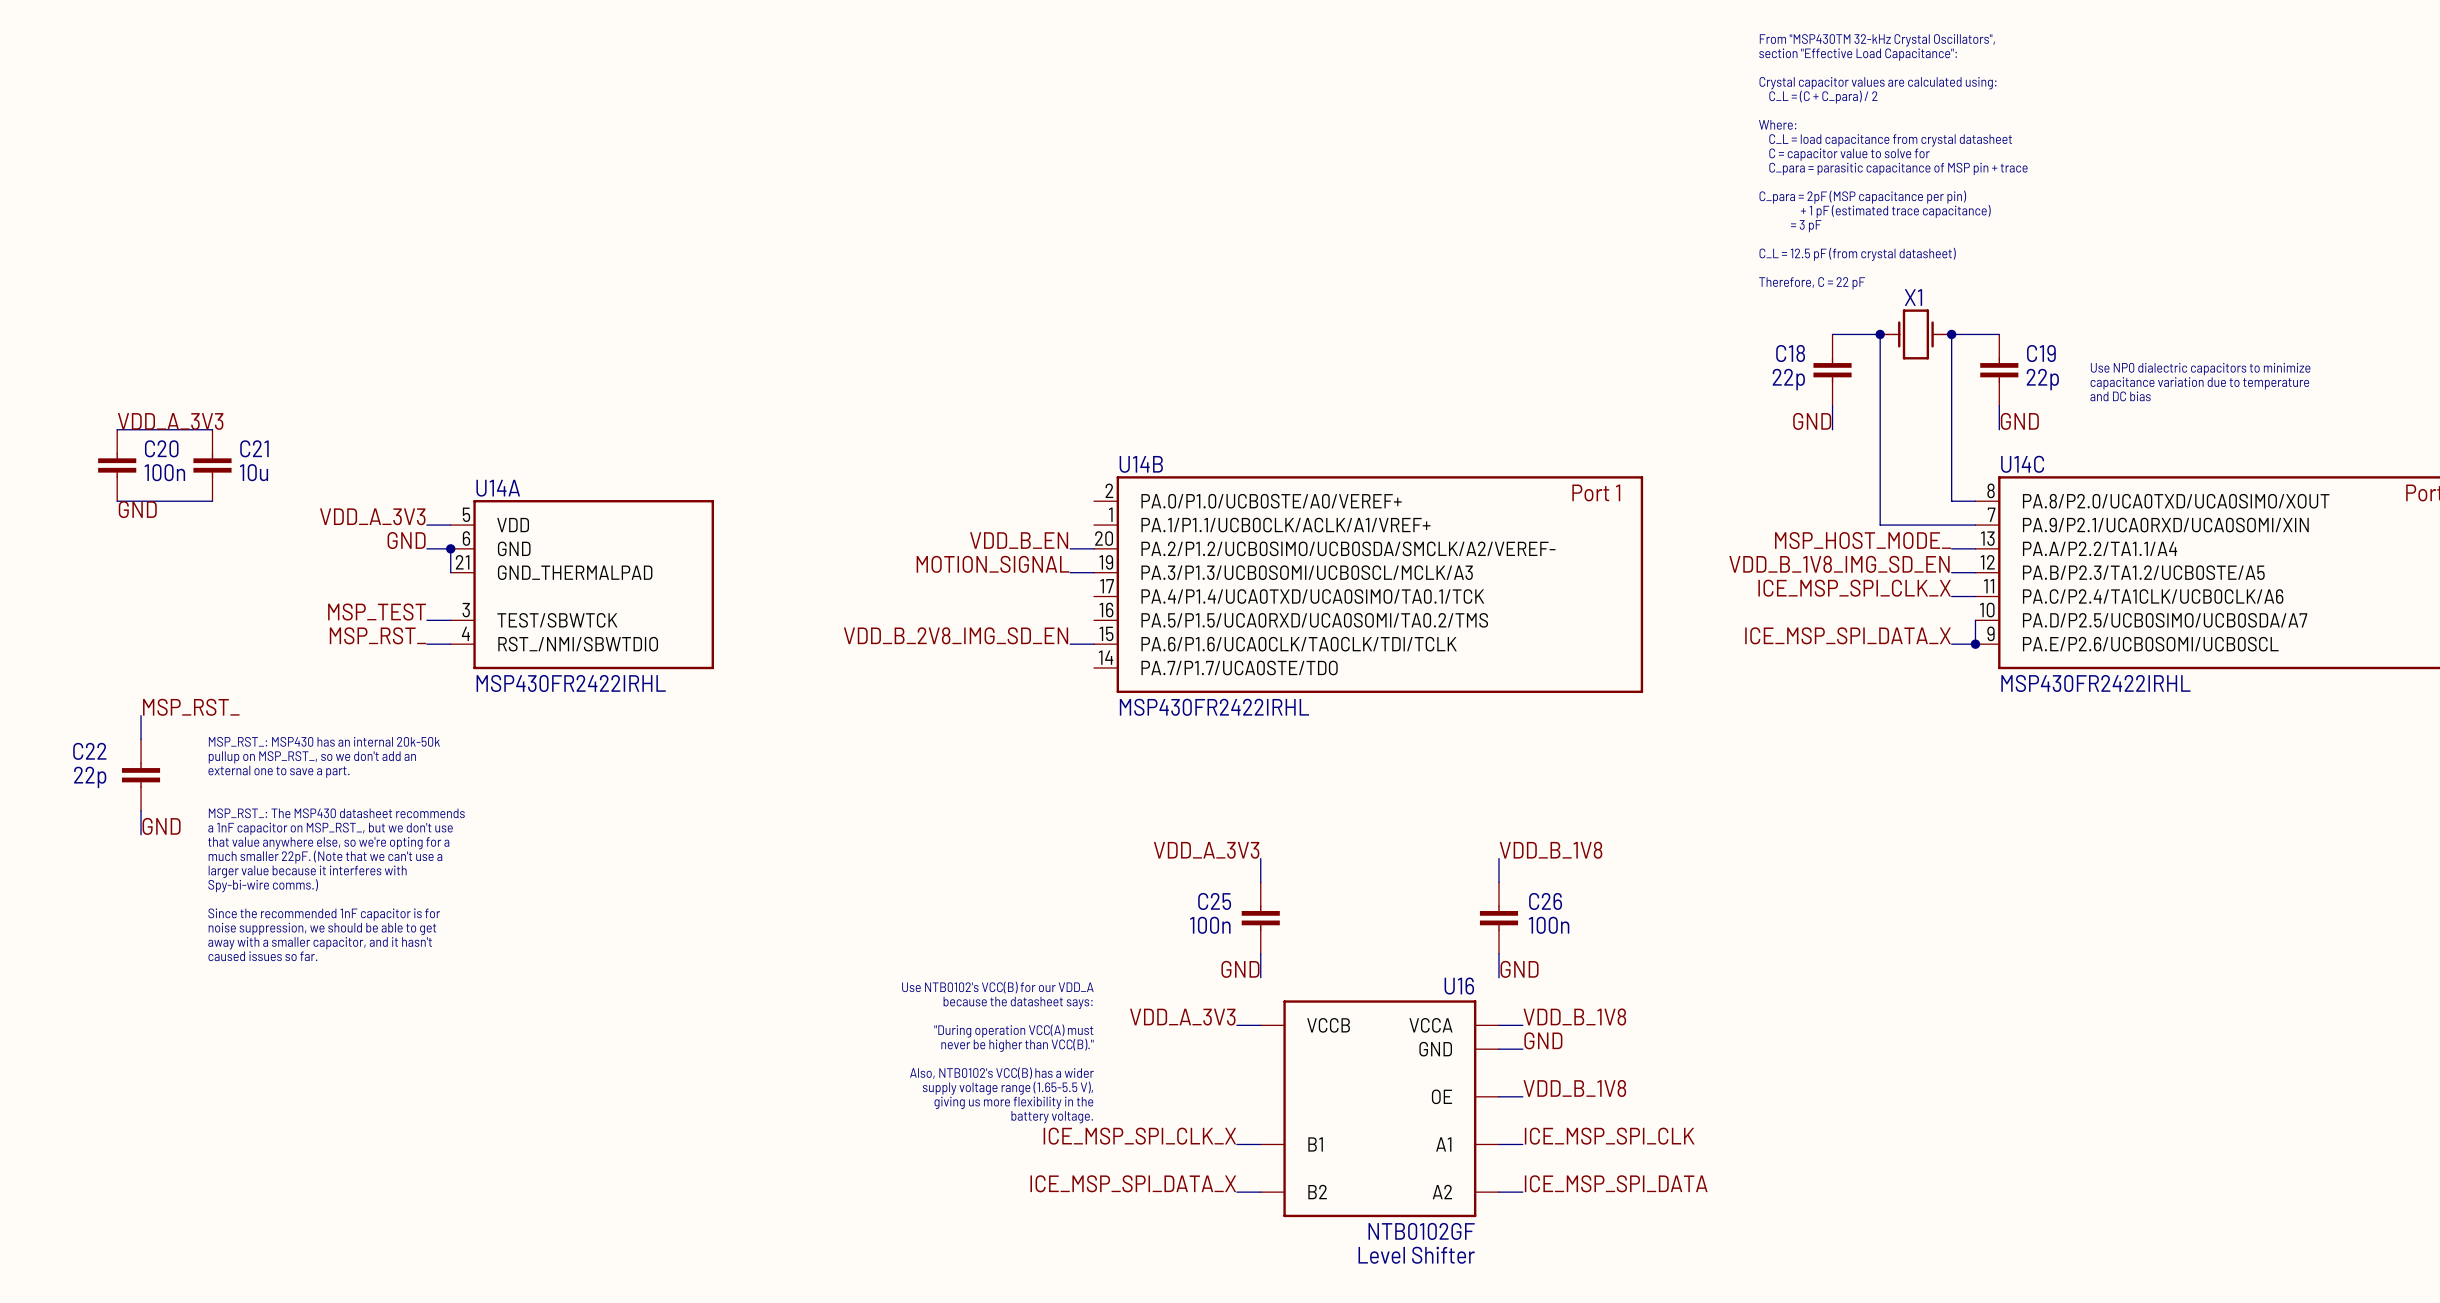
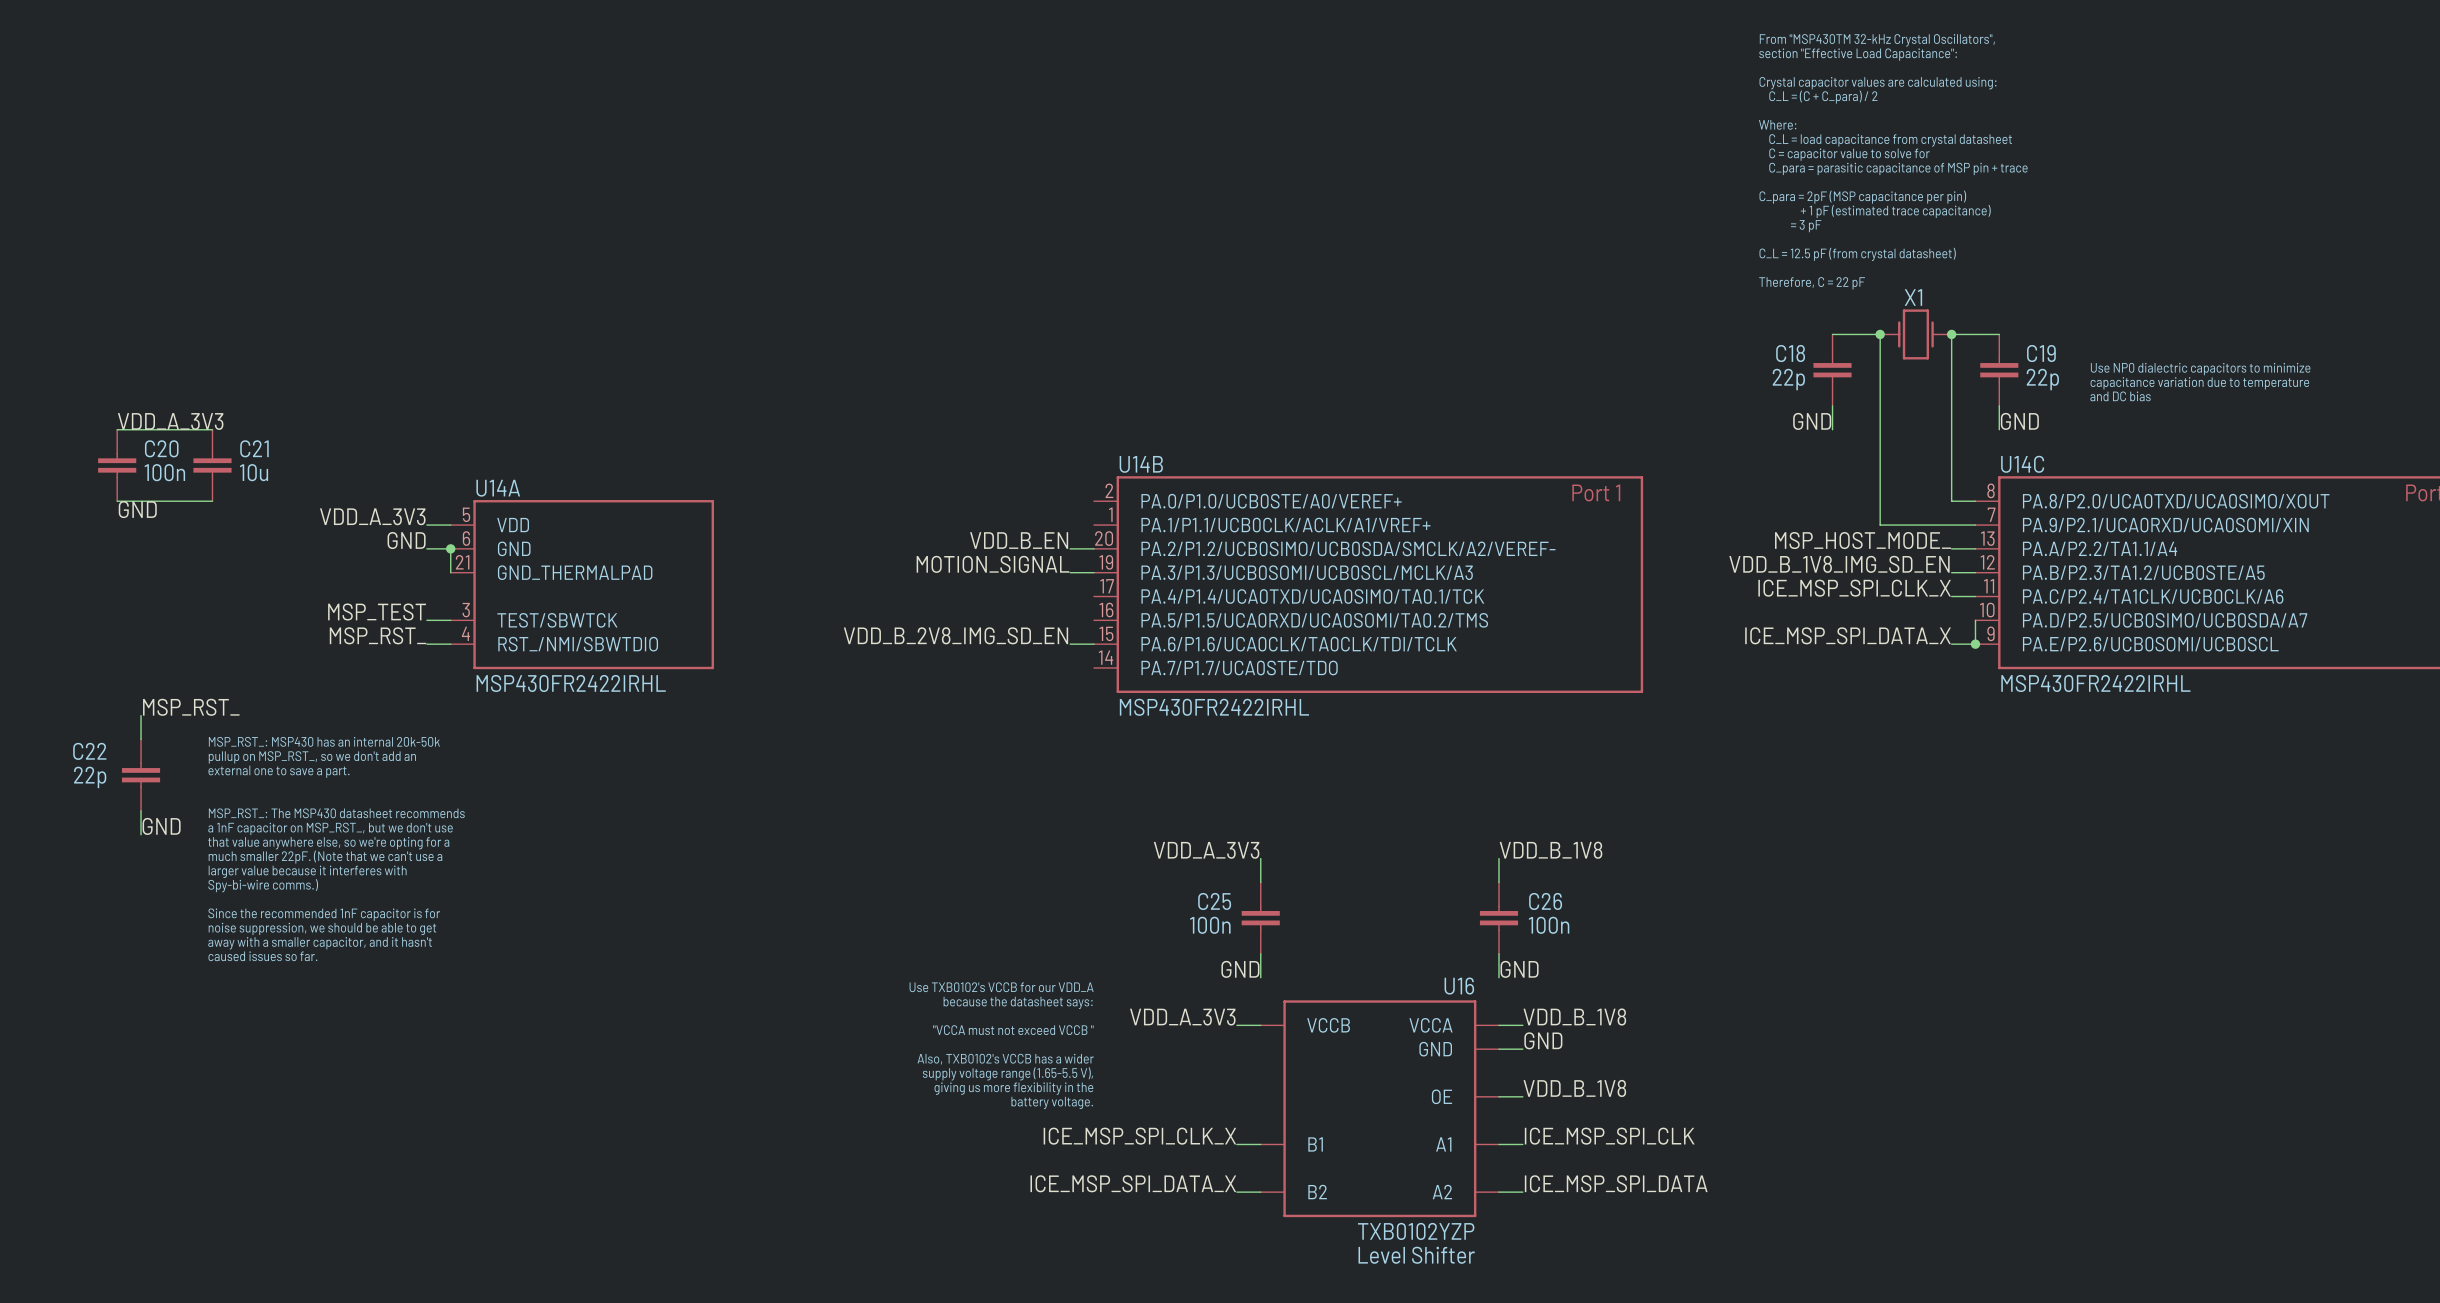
text: Use NTB0102's VCC(B) for our VDD_A (997, 987) -> Use TXB0102's VCCB for our VDD_A (1001, 987)
text: "During operation VCC(A) must (1013, 1031) -> "VCCA must not exceed VCCB " (1013, 1030)
text: never be higher than VCC(B)." (1017, 1045) -> none
text: none -> Also, TXB0102's VCCB has a wider (1005, 1059)
text: Also, NTB0102's VCC(B) has a wider (1001, 1073) -> supply voltage range (1.65-5.5 V), (1007, 1073)
text: supply voltage range (1.65-5.5 V), (1007, 1088) -> giving us more flexibility in the (1013, 1088)
text: giving us more flexibility in the (1013, 1102) -> battery voltage. (1052, 1102)
text: battery voltage. (1052, 1117) -> none
U16 text: NTB0102GF (1421, 1231) -> TXB0102YZP (1416, 1231)

